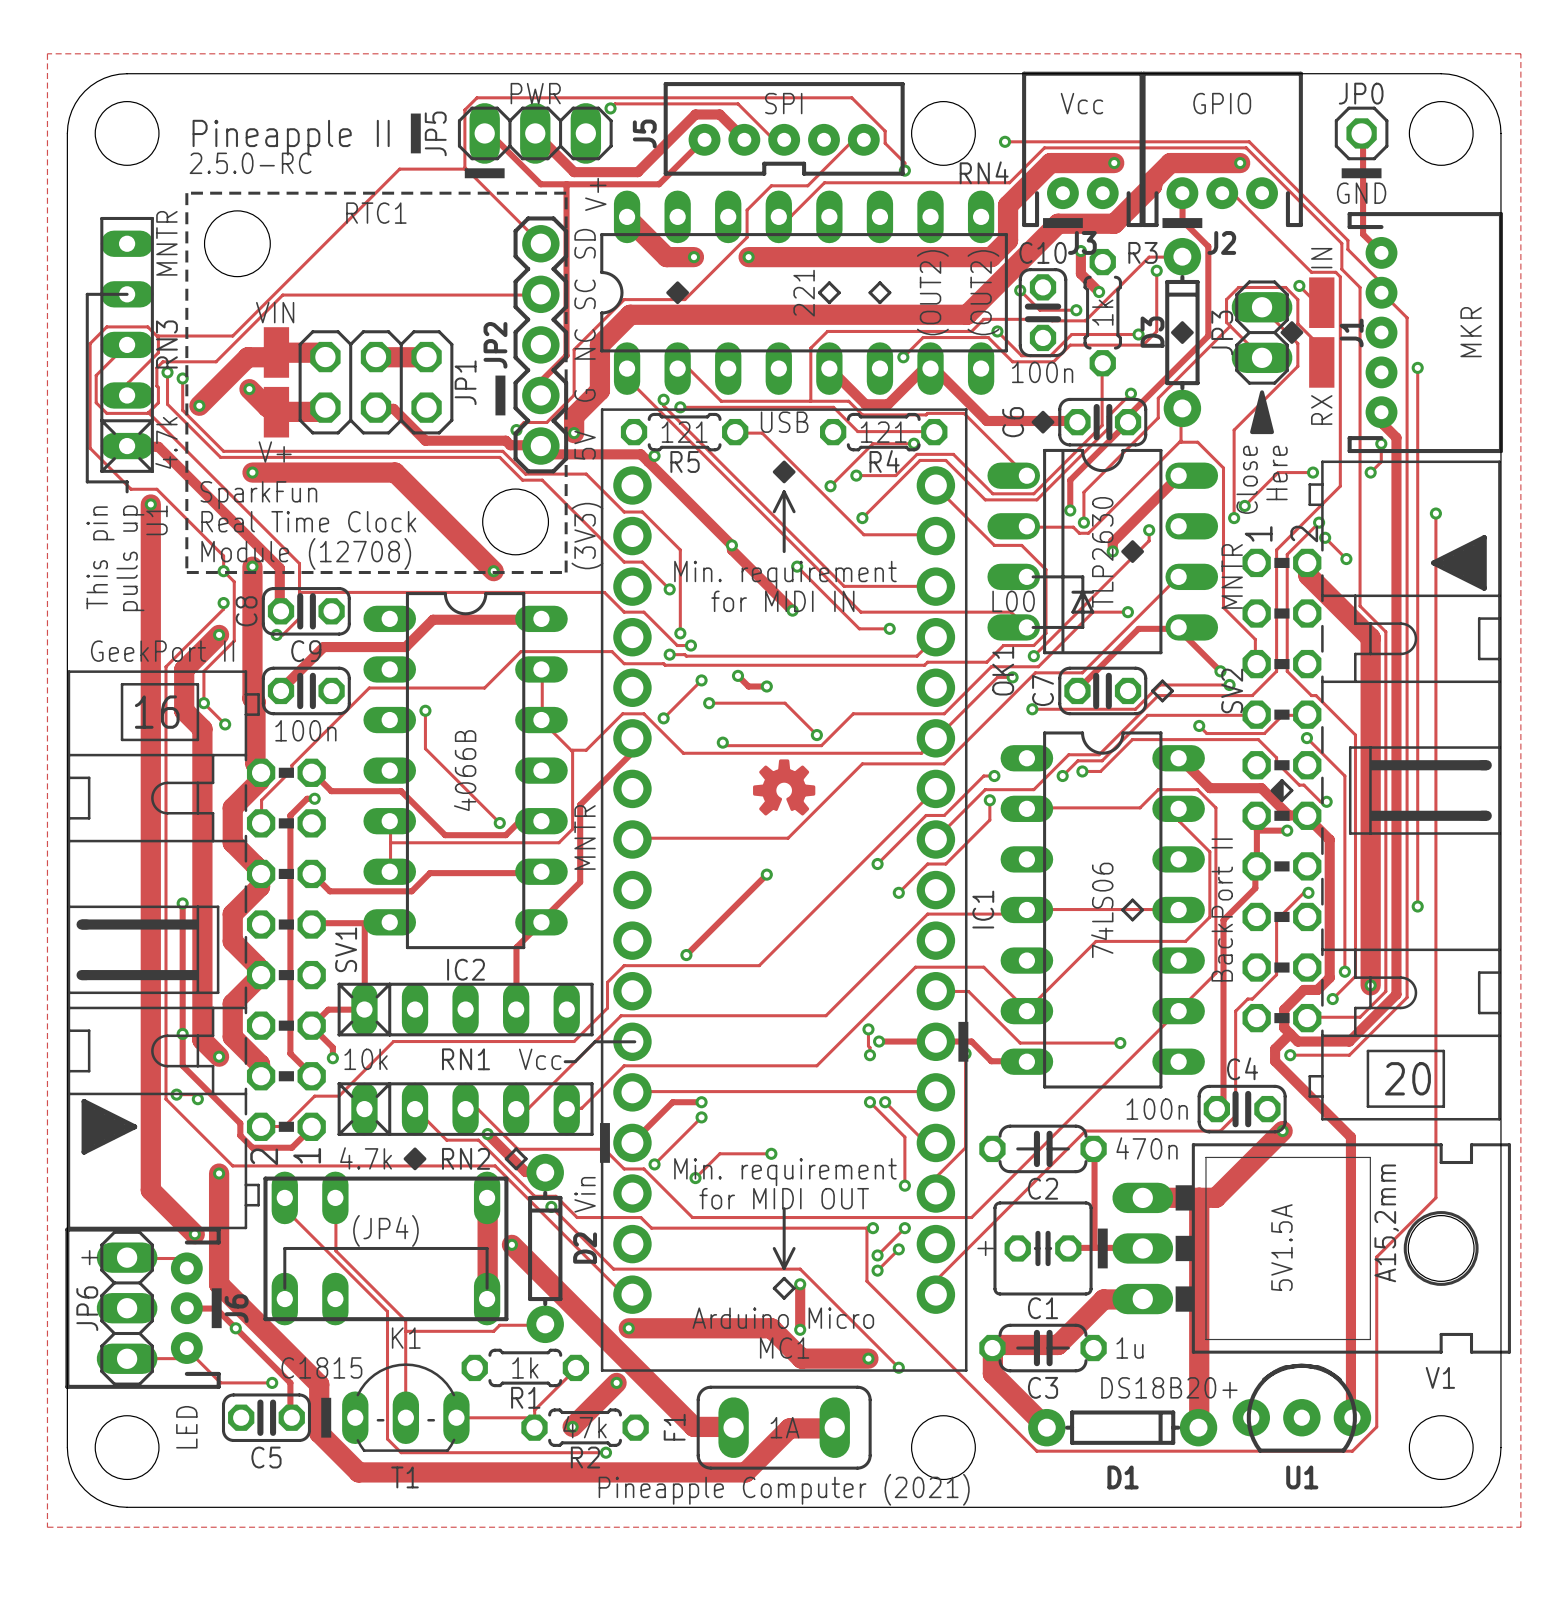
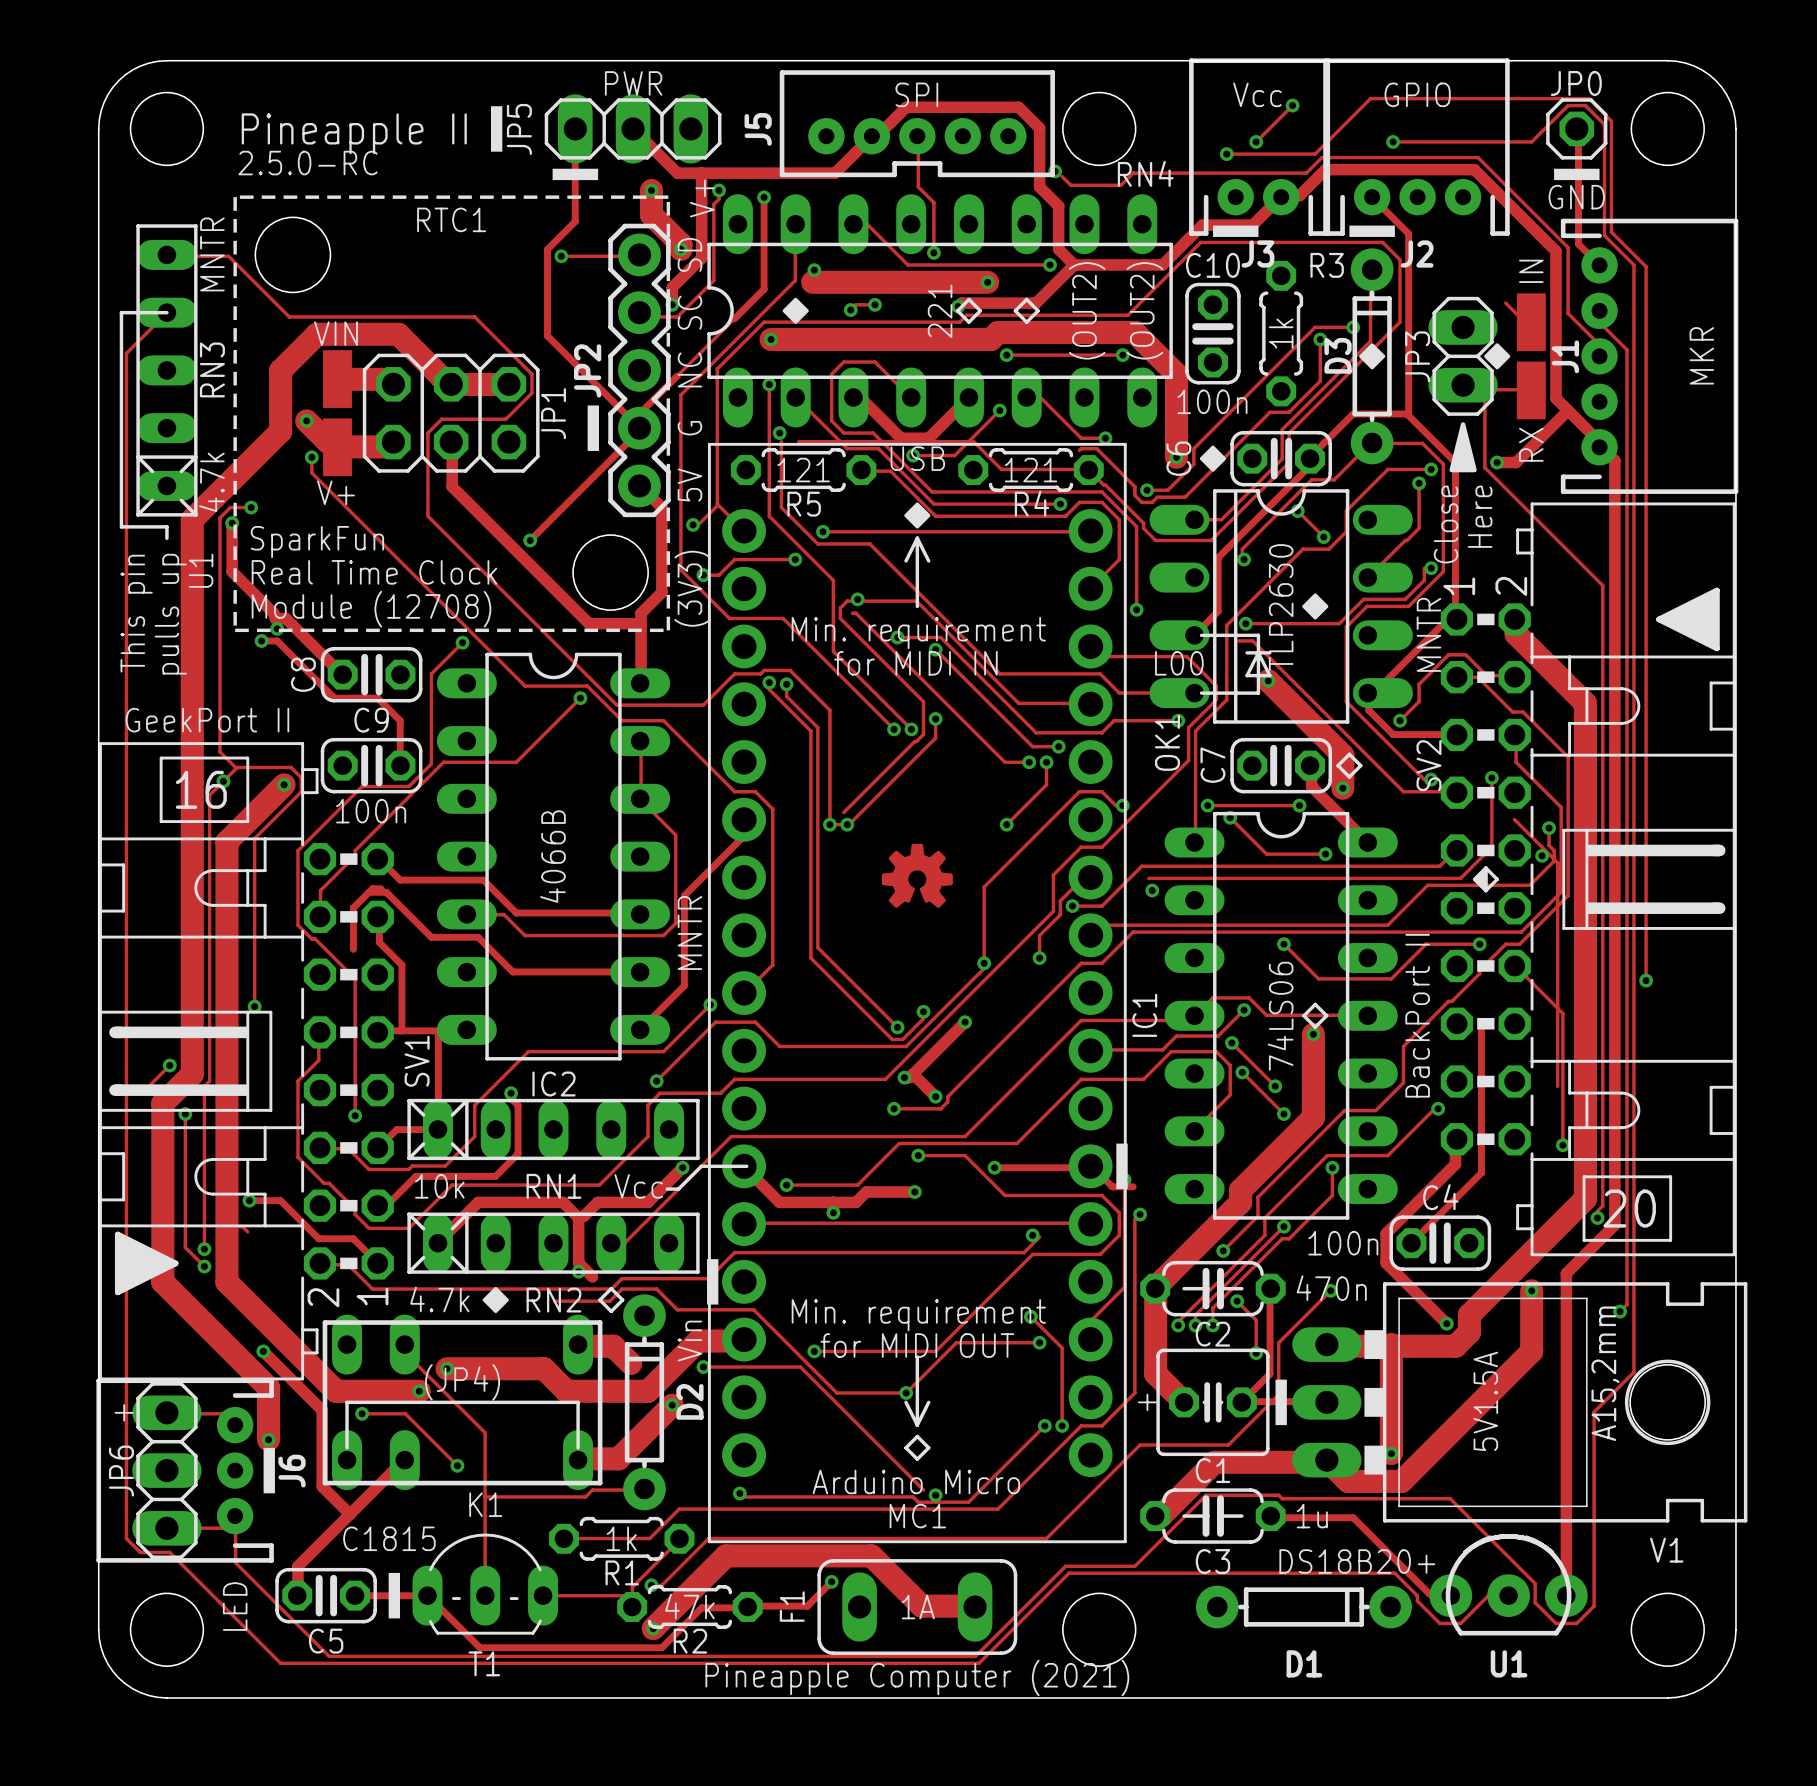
zone outline: (47, 53) (1520, 53) (1520, 1527) (47, 1527) (47, 53) -> none
track: (610, 108) (615, 103) (737, 103) (772, 138) (784, 139) -> (933, 252) (933, 202) (918, 187) (917, 136)
via: (610, 108) -> none
track: none -> (1292, 105) (1256, 141)
via: none -> (1292, 105)
track: (484, 133) (490, 134) (540, 184) (659, 184) (704, 139) -> none
track: (744, 139) (719, 114) (695, 114) (637, 172) -> (1074, 264) (1058, 249) (1058, 206) (1039, 187) (1039, 128) (1018, 107) (906, 107) (880, 133) (871, 136) (835, 173) (750, 173)
track: (863, 139) (853, 140) (807, 185) (771, 185) (747, 210) (747, 237) (684, 299) (624, 299) -> (764, 197) (764, 289) (734, 318)
track: (1005, 141) (1249, 141) (1347, 240) (1347, 249) (1381, 282) (1381, 292) -> none
via: (1005, 141) -> none
via: none -> (1256, 141)
track: none -> (1226, 154) (1315, 154) (1370, 98) (1588, 98) (1611, 121) (1611, 232) (1646, 266) (1646, 980)
via: none -> (1226, 154)
track: (1114, 163) (1050, 163) (1008, 205) (1008, 240) (991, 257) (748, 257) -> none
via: (1114, 163) -> none
track: (1240, 163) (1170, 163) (1152, 181) (1152, 185) (1114, 223) (1058, 223) (967, 314) (630, 314) (599, 345) (599, 390) (574, 416) (574, 433) -> none
via position: (1240, 163) -> (1393, 141)
track: (465, 168) (399, 169) (232, 336) (157, 336) -> none
track: (904, 170) (904, 163) (885, 143) (885, 131) (851, 97) (477, 97) (464, 109) (464, 167) (540, 243) -> (561, 256) (639, 254)
track: none -> (701, 173) (701, 258) (672, 287) (672, 304)
track: (918, 182) (824, 182) (791, 216) (778, 216) -> (1070, 185) (1062, 176)
track: (962, 182) (1009, 182) (1044, 147) (1246, 147) (1341, 243) (1341, 269) (1360, 287) (1360, 606) (1385, 631) (1385, 991) (1360, 1017) (1307, 1018) -> (1121, 185) (1133, 173) (1306, 173) (1322, 157) (1478, 157) (1568, 247) (1568, 313) (1599, 344) (1599, 356)
track: (566, 184) (566, 355) (542, 380) (540, 395) -> (575, 128) (575, 221) (547, 249) (547, 336) (639, 427)
track: none -> (651, 190) (651, 214) (680, 244) (680, 249)
via: none -> (651, 190)
via: none -> (719, 190)
via: none -> (764, 197)
track: (1182, 193) (1182, 220) (1208, 246) (1208, 336) (1129, 414) (1129, 419) -> (1372, 197) (1408, 233) (1408, 412) (1406, 413)
track: (1222, 193) (1232, 193) (1311, 272) (1335, 272) (1340, 276) (1340, 486) (1276, 549) (1276, 671) (1252, 695) (1158, 695) (1099, 754) (1068, 754) (1033, 789) -> none
track: (627, 216) (666, 257) (693, 257) -> none
track: none -> (853, 224) (868, 225) (907, 264) (1050, 264)
via: none -> (680, 249)
via: none -> (933, 252)
track: none -> (166, 254) (228, 256) (289, 316) (474, 316) (531, 374) (531, 393) (505, 419) (441, 419) (427, 433) (427, 516) (616, 705) (703, 705) (734, 673) (760, 673) (764, 670) (790, 670) (829, 710) (829, 824) (849, 824) (935, 738) (935, 718)
via: none -> (561, 256)
track: (1080, 251) (1080, 273) (1099, 292) -> none
via: (1080, 251) -> none
via: none -> (1050, 264)
track: none -> (1074, 264) (1162, 264) (1202, 225) (1252, 225) (1282, 195) (1299, 195) (1325, 169) (1474, 169) (1555, 251) (1555, 398) (1599, 441) (1599, 446)
track: none -> (1074, 264) (1036, 303) (961, 303) (958, 306)
via: (748, 257) -> none
track: (1181, 257) (1149, 257) (1085, 320) (983, 319) (971, 331) (964, 331) -> (1370, 270) (1370, 341) (1282, 429) (1282, 459) (1221, 519) (1194, 519)
track: none -> (812, 282) (987, 282)
via: none -> (987, 282)
track: (1156, 270) (1156, 331) (1143, 345) (1070, 345) (1053, 361) (1012, 361) (988, 337) (923, 337) (903, 357) -> none
via: (1156, 270) -> none
via: (1299, 285) -> none
via: none -> (672, 304)
track: none -> (874, 304) (855, 304) (850, 310)
via: none -> (874, 304)
via: none -> (958, 306)
track: (1020, 290) (1039, 310) (1076, 310) -> none
via: (1020, 290) -> none
via: none -> (850, 310)
via: (1099, 292) -> none
track: (1382, 293) (1407, 317) (1407, 997) (1349, 1055) (1290, 1055) -> (1601, 311) (1601, 323) (1627, 349) (1627, 1304) (1620, 1311)
track: none -> (166, 312) (126, 353) (126, 1538) (140, 1552) (169, 1552) (280, 1663) (978, 1663) (1069, 1573) (1394, 1573) (1417, 1595) (1417, 1600) (1439, 1623) (1460, 1623) (1488, 1595) (1508, 1595)
track: (540, 294) (282, 295) (216, 361) (162, 361) (156, 367) (158, 402) (147, 413) (106, 413) (96, 402) (96, 375) (127, 344) -> (639, 312) (644, 316) (677, 316) (713, 280) (713, 204) (719, 199) (719, 190)
track: none -> (1353, 327) (1315, 327) (1193, 448) (1193, 464) (1167, 490) (1147, 490)
via: none -> (1353, 327)
track: (1262, 307) (1297, 343) (1297, 366) (1234, 430) (1234, 518) -> none
via: (1076, 310) -> none
track: none -> (771, 339) (991, 339) (998, 332) (1134, 332) (1176, 374) (1176, 457)
via: none -> (771, 339)
track: (1230, 326) (1158, 398) (1158, 417) (1083, 492) (1083, 522) -> none
track: (862, 331) (827, 331) (810, 348) (810, 401) -> none
via: none -> (1006, 355)
via: none -> (1122, 355)
track: (997, 331) (1021, 355) (1050, 355) (1071, 334) (1138, 334) -> none
via: (997, 331) -> none
via position: (1138, 334) -> (1320, 339)
track: (574, 349) (574, 395) (546, 422) (524, 422) (516, 430) -> (677, 375) (634, 419) (639, 431) (530, 540)
track: (276, 352) (267, 357) (247, 357) (199, 405) -> none
track: none -> (451, 384) (441, 377) (398, 334) (317, 334) (280, 370) (280, 431) (192, 519) (192, 1074) (162, 1103) (162, 1282) (268, 1387) (268, 1439)
track: none -> (769, 384) (769, 516) (833, 580) (833, 651) (911, 729)
via: none -> (769, 384)
via: (903, 357) -> none
track: (1262, 357) (1226, 322) (1226, 299) (1238, 287) (1285, 287) (1297, 299) (1297, 323) (1320, 346) (1320, 361) -> (1597, 1218) (1597, 1211) (1602, 1205) (1602, 585) (1484, 467) (1484, 389) (1463, 385) (1467, 389) (1529, 389)
track: (1102, 363) (1102, 425) (1033, 493) -> (744, 530) (717, 504) (717, 368) (764, 322) (959, 322) (966, 315) (1127, 315) (1200, 242) (1382, 242) (1400, 259) (1400, 322) (1289, 433) (1289, 462) (1211, 540) (1202, 540)
track: (1417, 367) (1417, 906) -> none
via: (1417, 367) -> none
track: (627, 368) (627, 378) (860, 612) (1011, 612) (1026, 627) -> (781, 441) (781, 507) (817, 543) (869, 543) (999, 673) (1100, 673) (1119, 692) (1193, 692)
track: (829, 368) (865, 404) (888, 404) (923, 369) (930, 368) (935, 369) (986, 420) (1077, 422) -> (968, 397) (928, 438) (900, 438) (861, 398) (853, 397)
track: none -> (1026, 397) (1041, 398) (1081, 438) (1105, 438)
track: (678, 369) (689, 369) (709, 389) -> (911, 397) (874, 362) (843, 362) (831, 374) (831, 420)
track: none -> (797, 398) (847, 448) (878, 448) (933, 504) (1060, 504)
track: (167, 372) (167, 404) (220, 457) (499, 457) (522, 480) (542, 480) (624, 562) -> (795, 224) (795, 280) (680, 394) (680, 569) (729, 618) (734, 618)
via: (167, 372) -> none
track: (182, 378) (182, 410) (223, 451) (502, 451) (525, 474) (586, 474) (624, 512) (642, 512) (680, 549) (680, 633) -> none
via: (182, 378) -> none
track: none -> (999, 410) (954, 455) (913, 455)
via: none -> (999, 410)
track: none -> (1568, 410) (1516, 462) (1497, 462)
track: none -> (1406, 413) (1353, 413) (1311, 455)
track: (1130, 393) (1108, 416) (1108, 428) (1036, 499) (985, 499) (961, 475) -> (1090, 588) (1119, 559) (1119, 519)
via: (1130, 393) -> none
track: (127, 395) (128, 383) (158, 352) (158, 337) (147, 326) (106, 326) (90, 343) (90, 448) (131, 489) (156, 489) (223, 556) (223, 571) (234, 581) (234, 640) (203, 671) (203, 703) (225, 724) -> none
track: (663, 399) (663, 405) (844, 586) (935, 586) -> none
track: (719, 399) (848, 401) (862, 414) (926, 414) -> (843, 433) (873, 433) (932, 491) (1101, 491) (1136, 526) (1136, 609)
via: none -> (1105, 438)
via: (199, 405) -> none
via: (680, 407) -> none
track: (376, 408) (393, 408) (425, 440) (505, 440) (510, 445) (540, 446) -> (452, 443) (452, 486) (589, 623) (641, 623)
track: (1181, 408) (1181, 440) (1088, 533) (1079, 533) (1073, 527) (1026, 526) -> (1370, 443) (1334, 479) (1311, 479) (1242, 549) (1242, 554)
track: none -> (1372, 442) (1422, 443) (1443, 464) (1443, 571) (1408, 606) (1367, 606) (1346, 627) (1346, 701) (1424, 779) (1431, 779)
track: (148, 412) (299, 563) (299, 618) (282, 634) (276, 634) -> none
track: (1381, 412) (1382, 424) (1396, 437) (1396, 994) (1349, 1041) (1297, 1041) (1284, 1027) (1284, 1009) (1303, 989) (1317, 989) (1329, 977) (1329, 839) (1306, 815) (1288, 815) (1261, 788) (1209, 788) (1178, 758) -> (1310, 765) (1311, 765) (1311, 786) (1367, 842)
track: (941, 413) (964, 413) (1026, 475) -> (1096, 448) (1134, 486) (1134, 495) (1141, 502) (1152, 502) (1157, 497) (1185, 497) (1270, 412) (1289, 412) (1320, 381) (1320, 339)
via: none -> (913, 455)
track: none -> (311, 457) (311, 472) (524, 686) (587, 686) (622, 720)
via: none -> (311, 457)
via: none -> (1176, 457)
track: (1127, 422) (1070, 480) (1070, 510) -> (1309, 459) (1309, 465) (1218, 557) (1218, 611) (1194, 635)
via: none -> (1497, 462)
via: (516, 430) -> none
track: none -> (1431, 469) (1387, 469) (1346, 511) (1346, 531) (1328, 549) (1302, 549) (1226, 625) (1226, 699) (1195, 731) (1194, 842)
via: none -> (1431, 469)
via: (574, 433) -> none
track: (760, 433) (863, 534) (935, 536) -> (890, 471) (935, 516) (1065, 516) (1079, 502)
track: (1180, 441) (1197, 442) (1223, 468) -> (1419, 483) (1419, 511)
track: (913, 443) (873, 443) (830, 486) -> none
via position: (913, 443) -> (1060, 504)
via: none -> (1419, 483)
track: (1381, 443) (1381, 461) (1370, 472) -> none
via: (1381, 443) -> none
track: (127, 446) (158, 446) (279, 568) (279, 610) -> (232, 523) (232, 571) (273, 613) (275, 618) (285, 618) (341, 673)
via: none -> (1147, 490)
track: (549, 454) (640, 454) (731, 545) (731, 549) (792, 610) -> (649, 495) (661, 507) (661, 592) (641, 613) (640, 683)
via: (654, 455) -> none
track: (926, 460) (920, 460) (862, 518) -> none
track: none -> (718, 504) (698, 524) (693, 524)
track: none -> (251, 507) (230, 507) (220, 517) (220, 751) (236, 768)
via: none -> (251, 507)
track: none -> (1297, 511) (1323, 537)
via: none -> (1297, 511)
track: (252, 472) (395, 472) (493, 571) -> none
via: (252, 472) -> none
track: (1313, 472) (1278, 472) (1244, 505) -> none
via: (1313, 472) -> none
via: (1370, 472) -> none
track: (856, 475) (895, 475) (917, 454) (953, 454) (982, 483) -> (1088, 470) (1143, 523) (1143, 528)
via: (856, 475) -> none
track: (1178, 475) (1112, 542) (1112, 551) -> none
via: none -> (232, 523)
via: none -> (693, 524)
track: (1223, 483) (1223, 607) (1255, 639) (1255, 663) -> (1406, 413) (1455, 462) (1456, 619) (1446, 620) (1372, 694) (1367, 693) (1368, 710) (1393, 734) (1455, 734)
track: none -> (1419, 528) (1367, 577)
track: none -> (823, 531) (1089, 531)
via: none -> (823, 531)
via: (830, 486) -> none
track: (935, 486) (994, 545) (1021, 545) (1045, 569) (1045, 621) -> (1090, 646) (1100, 656) (1186, 656) (1216, 686)
via: none -> (1323, 537)
via: none -> (530, 540)
track: (150, 504) (150, 1190) (194, 1234) -> none
via: (150, 504) -> none
via: (1244, 505) -> none
track: none -> (795, 559) (734, 559) (719, 575) (703, 575)
via: none -> (795, 559)
track: (1435, 513) (1435, 1197) (1411, 1222) -> (1393, 141) (1531, 141) (1568, 105) (1585, 105) (1604, 124) (1604, 235) (1633, 264) (1633, 1372)
via: (1435, 513) -> none
via: (862, 518) -> none
track: none -> (1424, 568) (1424, 580) (1405, 599) (1363, 599) (1339, 623) (1245, 623)
via: (1083, 522) -> none
track: (1319, 522) (1287, 554) (1287, 671) (1311, 695) (1316, 695) -> (1514, 734) (1516, 762) (1524, 770)
via: (1319, 522) -> none
via: none -> (703, 575)
track: (1149, 530) (1149, 540) (1033, 656) -> none
via: (1149, 530) -> none
track: (1325, 537) (1346, 559) -> none
via: (1325, 537) -> none
via: (1112, 551) -> none
via: none -> (1136, 609)
track: none -> (852, 613) (855, 613) (1004, 762) (1029, 762)
via: (1346, 559) -> none
track: (642, 562) (669, 589) -> (755, 618) (783, 618) (894, 729)
track: (252, 566) (252, 698) (255, 701) (255, 763) (261, 772) (260, 780) (232, 807) (232, 842) (255, 865) (261, 873) (260, 886) (232, 914) (232, 941) (257, 965) (261, 975) (232, 1003) (232, 1036) (260, 1064) (261, 1076) -> none
via: (252, 566) -> none
track: (797, 566) (859, 628) (889, 628) -> none
via: (797, 566) -> none
via: none -> (1245, 623)
via: (493, 571) -> none
track: (1178, 576) (1082, 672) (1035, 672) (1021, 686) -> (1202, 713) (1188, 727) (1188, 760)
via: none -> (897, 637)
track: none -> (261, 640) (277, 640) (334, 698) (377, 698) (400, 720) (400, 765)
via: none -> (261, 640)
track: none -> (462, 642) (431, 673) (431, 764) (408, 786) (362, 786) (297, 850) (297, 925) (311, 939) (315, 939) (355, 978) (355, 1115)
via: none -> (462, 642)
via: (669, 589) -> none
track: none -> (935, 649) (1032, 746) (1058, 746)
via: none -> (935, 649)
track: (299, 592) (604, 592) (624, 612) (643, 612) (677, 645) (690, 645) -> none
track: (223, 603) (223, 609) (165, 666) (165, 1099) (232, 1165) (495, 1165) (622, 1293) (632, 1294) -> none
via: (223, 603) -> none
via: (792, 610) -> none
track: (1127, 612) (1093, 612) (1038, 666) (991, 666) (944, 713) -> (1122, 805) (1115, 805) (1100, 791)
via: (1127, 612) -> none
track: none -> (1457, 677) (1478, 677) (1512, 712) (1523, 712) (1568, 757) (1568, 895) (1519, 944) (1505, 944) (1452, 1001) (1448, 1001) (1403, 1046) (1403, 1082) (1375, 1110) (1344, 1110) (1257, 1197) (1257, 1216) (1223, 1250)
track: none -> (1514, 677) (1514, 675) (1486, 675) (1465, 654) (1448, 654) (1419, 684) (1419, 701) (1400, 720)
track: none -> (1268, 680) (1342, 755) (1342, 788)
via: none -> (1268, 680)
track: (541, 618) (433, 619) (405, 647) (323, 647) (281, 690) -> none
via: none -> (769, 682)
track: none -> (786, 684) (786, 696) (817, 727) (817, 947) (897, 1027)
via: none -> (786, 684)
via: (889, 628) -> none
via: none -> (580, 698)
via: (680, 633) -> none
track: (219, 634) (184, 669) (184, 710) (202, 728) (202, 1040) (219, 1056) -> none
via: (219, 634) -> none
via: (276, 634) -> none
track: (1369, 636) (1370, 637) (1370, 985) -> (1585, 703) (1585, 1198) (1469, 1315) (1469, 1332) (1455, 1346) (1327, 1346) (1326, 1344)
track: (935, 637) (917, 656) (686, 656) -> (1090, 704) (1018, 703) (916, 601) (847, 601) (840, 608) (840, 618) (923, 701) (923, 734) (843, 812)
via: (690, 645) -> none
track: (1033, 645) (1003, 645) (986, 662) (945, 662) -> (1178, 720) (1114, 720) (1101, 732)
via: none -> (935, 718)
track: (525, 651) (521, 651) (484, 688) (433, 688) -> (580, 698) (516, 762)
track: (561, 651) (612, 651) (624, 663) (665, 665) (924, 665) (927, 662) -> (897, 637) (940, 637) (1036, 732) (1081, 732)
via: none -> (1178, 720)
via: none -> (1400, 720)
track: (669, 654) (684, 654) -> (769, 682) (769, 689) (803, 724)
via: (669, 654) -> none
track: none -> (805, 725) (810, 731) (810, 958) (892, 1039) (902, 1039) (923, 1018) (923, 1011)
via: (1033, 656) -> none
via: none -> (894, 729)
via: none -> (911, 729)
track: (1220, 671) (1178, 627) (1138, 628) (1077, 690) -> none
via: (1220, 671) -> none
via: none -> (1058, 746)
track: (737, 675) (748, 686) (766, 686) -> none
via: (737, 675) -> none
track: (1012, 677) (997, 677) (921, 753) (683, 753) (642, 713) -> (744, 993) (772, 965) (772, 809) (755, 791)
via: (1012, 677) -> none
track: (701, 680) (663, 718) -> none
via: (701, 680) -> none
track: (1229, 684) (1159, 684) (1135, 709) (1032, 709) -> none
via: (1229, 684) -> none
via: (766, 686) -> none
via: none -> (1029, 762)
track: none -> (1046, 762) (1046, 784) (1006, 824)
via: none -> (1046, 762)
track: none -> (1491, 777) (1491, 847) (1460, 878) (1389, 878)
via: none -> (1491, 777)
via: (203, 703) -> none
track: (709, 703) (785, 703) (816, 735) -> none
via: (709, 703) -> none
via: none -> (1431, 779)
via: none -> (223, 781)
track: none -> (284, 784) (226, 841) (226, 1282) (336, 1391) (419, 1391)
via: none -> (284, 784)
via position: (1032, 709) -> (1207, 805)
track: (425, 710) (425, 748) (499, 823) -> none
via: (425, 710) -> none
via: none -> (1342, 788)
track: (624, 713) (586, 750) (571, 750) -> (734, 791) (663, 720)
track: (926, 713) (853, 713) (821, 745) (725, 745) (722, 742) -> (1079, 791) (984, 887) (984, 968) (906, 1046) (779, 1046) (755, 1022) (715, 1022) (656, 1081)
track: (1256, 714) (1147, 715) (1102, 760) (1077, 760) (1062, 776) -> (1456, 792) (1403, 791) (1252, 640) (1238, 640)
track: (1307, 714) (1282, 715) (1264, 733) (1206, 733) (1199, 725) -> none
via: (663, 718) -> none
via: (225, 724) -> none
via: none -> (1122, 805)
track: none -> (1207, 805) (1299, 805)
via: none -> (1299, 805)
via: (1199, 725) -> none
track: (1347, 727) (1355, 735) (1355, 976) (1332, 999) -> none
via: (816, 735) -> none
track: none -> (1230, 817) (1266, 854) (1325, 854)
via: none -> (1230, 817)
via: (1306, 738) -> none
via: none -> (829, 824)
via: none -> (1006, 824)
via: none -> (1549, 828)
track: (945, 762) (862, 763) (788, 838) (632, 839) -> none
via: none -> (1325, 854)
via: none -> (1542, 855)
track: (1082, 771) (1100, 771) (1132, 739) (1258, 739) (1276, 757) (1276, 762) (1299, 785) (1303, 785) (1320, 801) (1326, 801) -> none
via: (1082, 771) -> none
track: (994, 776) (983, 776) (980, 779) -> (1456, 850) (1439, 866) (1141, 866)
via: (994, 776) -> none
via: (1062, 776) -> none
track: (935, 789) (759, 965) (756, 965) -> (1101, 847) (1081, 847) (1053, 874) (1053, 911) (885, 1079)
track: none -> (1089, 878) (1082, 878) (1060, 900) (1060, 914) (1039, 935) (1039, 958)
track: (986, 789) (944, 830) -> (1549, 828) (1549, 845) (1554, 850) (1554, 861) (1529, 885) (1427, 885) (1387, 925) (1100, 925)
track: (1158, 789) (1140, 807) (1026, 808) -> (1344, 878) (1202, 878)
track: (1197, 789) (1215, 807) (1215, 973) (971, 1217) (692, 1217) (643, 1168) (624, 1168) (604, 1149) (555, 1149) -> (1039, 1342) (956, 1342) (906, 1393) (836, 1393) (753, 1309) (677, 1309) (656, 1289)
track: (401, 791) (445, 835) (505, 835) (519, 821) (541, 821) -> (479, 880) (483, 880) (516, 913) (640, 914)
via: (314, 798) -> none
track: (989, 800) (989, 820) (973, 836) -> (1561, 807) (1561, 892) (1521, 932) (1133, 932)
via: (1326, 801) -> none
track: (1178, 808) (1179, 821) (1209, 851) (1209, 917) (1185, 941) (1096, 941) (1058, 979) -> (786, 1185) (857, 1185) (899, 1143) (1017, 1143) (1081, 1079) (1143, 1079) (1171, 1051) (1216, 1051) (1230, 1065) (1230, 1094)
via: none -> (1072, 906)
track: (945, 813) (926, 815) (877, 864) -> (1101, 906) (1072, 906)
track: (1256, 815) (1255, 888) (1223, 920) (1223, 1102) -> (1481, 1023) (1481, 1172) (1419, 1235)
track: (390, 821) (389, 871) -> none
track: none -> (377, 916) (379, 918) (379, 942) (401, 965) (401, 1030)
via: (499, 823) -> none
track: (1256, 830) (1287, 830) -> none
via position: (1287, 830) -> (1479, 944)
track: (561, 839) (558, 842) (390, 842) -> (663, 935) (524, 935) (504, 914) (467, 914)
track: none -> (1283, 944) (1318, 978) (1391, 978) (1426, 944) (1479, 944)
via: none -> (1283, 944)
track: (290, 851) (290, 1053) (311, 1076) -> (511, 1093) (511, 1098) (518, 1105) (518, 1153) (495, 1176) (415, 1176) (388, 1204) (377, 1205)
via: none -> (984, 963)
via position: (877, 864) -> (1039, 958)
track: none -> (1514, 965) (1562, 1013) (1562, 1145)
track: (541, 871) (429, 873) (411, 891) (329, 891) (311, 873) -> (640, 972) (512, 971) (478, 937) (431, 937) (386, 892) (369, 892)
track: (766, 874) (686, 955) -> none
via: (766, 874) -> none
track: (580, 882) (516, 947) (516, 1009) -> (684, 984) (640, 1029)
track: none -> (1048, 996) (947, 1096) (947, 1101) (940, 1108) (894, 1108)
via: (898, 892) -> none
track: (1308, 892) (1303, 892) (1276, 920) (1276, 974) (1252, 999) (1247, 999) (1235, 1011) (1235, 1115) (1220, 1131) (1085, 1131) (936, 1279) (935, 1294) -> none
via: (1308, 892) -> none
track: none -> (710, 1004) (663, 1051) (528, 1051) (474, 1105) (474, 1136) (445, 1166) (412, 1166) (408, 1169) (369, 1169) (348, 1148) (319, 1147)
via: none -> (710, 1004)
track: none -> (254, 1006) (254, 838) (301, 791) (301, 777) (291, 767) (237, 767) (209, 795) (209, 1081) (204, 1086) (204, 1249)
track: (182, 903) (182, 1065) (240, 1123) (240, 1135) (252, 1147) (291, 1147) (311, 1126) -> (249, 1200) (280, 1200) (318, 1238) (353, 1238) (377, 1263)
via position: (182, 903) -> (254, 1006)
track: none -> (1244, 1010) (1218, 1036) (1176, 1036) (1162, 1049) (1090, 1050)
via: none -> (1244, 1010)
via: none -> (923, 1011)
via position: (1417, 906) -> (1646, 980)
track: (1027, 909) (1089, 909) -> (1195, 1015) (1212, 997) (1249, 997) (1266, 1015)
track: none -> (965, 1022) (909, 1077) (904, 1077)
via: none -> (965, 1022)
via: none -> (897, 1027)
track: none -> (1313, 1034) (1313, 1117) (1240, 1190) (1240, 1202) (1155, 1288) (1155, 1373) (1184, 1402)
via: none -> (1313, 1034)
track: none -> (1231, 1042) (1275, 1086)
via: none -> (1231, 1042)
track: none -> (169, 1065) (148, 1086)
via: none -> (169, 1065)
via: (686, 955) -> none
track: none -> (1242, 1072) (1283, 1114)
via: none -> (1242, 1072)
track: none -> (913, 1074) (935, 1096)
via: none -> (904, 1077)
via: none -> (656, 1081)
via: none -> (1275, 1086)
via: (1344, 971) -> none
via: none -> (511, 1093)
track: (612, 977) (607, 982) (607, 1008) (574, 1041) (393, 1041) (376, 1058) -> (720, 1093) (660, 1093) (648, 1105) (648, 1136) (599, 1185) (452, 1185)
via: none -> (935, 1096)
via: (1370, 985) -> none
via: none -> (894, 1108)
track: (935, 991) (968, 991) (1020, 1043) (1120, 1043) -> none
track: none -> (1438, 1108) (1434, 1108) (1387, 1155) (1327, 1155) (1264, 1218) (1264, 1235) (1178, 1321) (1178, 1325)
via: none -> (1438, 1108)
track: none -> (185, 1114) (185, 1247) (204, 1266)
via: none -> (185, 1114)
via: none -> (1283, 1114)
via: none -> (355, 1115)
via: (1332, 999) -> none
track: (1026, 1011) (983, 967) (915, 967) (816, 1065) (624, 1065) (581, 1108) (566, 1109) -> none
track: none -> (1456, 1139) (1455, 1164) (1386, 1233) (1386, 1263) (1446, 1323)
via: none -> (1562, 1145)
track: (311, 1025) (332, 1047) (332, 1058) -> none
track: (868, 1029) (869, 1055) -> none
via: (868, 1029) -> none
track: none -> (918, 1155) (965, 1155) (1004, 1195) (1101, 1195) (1119, 1212) (1119, 1235) (1100, 1254) (1032, 1254) (935, 1351) (814, 1351)
via: none -> (918, 1155)
via: (182, 1033) -> none
track: (1290, 1033) (1275, 1049) (1275, 1061) (1350, 1137) (1352, 1417) -> (1599, 447) (1614, 460) (1614, 1224) (1566, 1273) (1566, 1595)
track: none -> (744, 1166) (779, 1202) (855, 1202) (866, 1192) (914, 1192)
track: (879, 1041) (971, 1041) (991, 1061) (1026, 1061) -> none
via: (879, 1041) -> none
track: none -> (682, 1167) (648, 1202) (597, 1202) (583, 1216) (578, 1218)
via: none -> (682, 1167)
track: none -> (994, 1167) (1090, 1166) (1112, 1186) (1133, 1186)
via: none -> (994, 1167)
via: (1120, 1043) -> none
track: none -> (1332, 1167) (1332, 1195) (1289, 1238) (1282, 1238) (1212, 1308) (1212, 1325)
via: none -> (1332, 1167)
via: (869, 1055) -> none
via: (1290, 1055) -> none
via: (219, 1056) -> none
via: (332, 1058) -> none
via: none -> (786, 1185)
via: none -> (914, 1192)
via: none -> (249, 1200)
via: none -> (833, 1212)
track: none -> (1140, 1214) (1134, 1219) (1134, 1393) (1101, 1425) (1081, 1425) (998, 1509) (679, 1509) (649, 1538) (563, 1538)
via: none -> (1140, 1214)
track: none -> (578, 1218) (578, 1263) (592, 1276)
track: none -> (578, 1218) (563, 1202) (478, 1202) (437, 1243)
via: none -> (1597, 1218)
via: (176, 1094) -> none
track: none -> (1283, 1226) (1195, 1315) (1195, 1325)
via: none -> (1283, 1226)
track: (314, 1096) (284, 1126) (261, 1126) -> (381, 1228) (369, 1228) (355, 1214) (355, 1209) (329, 1183) (323, 1183) (297, 1157) (297, 1081) (318, 1060) (319, 1032)
via: (197, 1099) -> none
track: (701, 1102) (672, 1102) (632, 1142) -> none
via: (701, 1102) -> none
track: (869, 1102) (904, 1137) (904, 1185) -> none
via: (869, 1102) -> none
track: (885, 1102) (924, 1141) (935, 1142) -> none
track: none -> (1039, 1237) (1024, 1252) (734, 1252) (708, 1278) (622, 1278) (611, 1289) (372, 1289) (348, 1264) (319, 1263)
track: (415, 1109) (446, 1140) (478, 1140) (534, 1196) (555, 1196) (577, 1217) (596, 1217) -> none
track: (465, 1109) (478, 1109) (517, 1149) (525, 1149) -> (554, 1301) (609, 1301) (622, 1289)
via: none -> (204, 1249)
via: none -> (1223, 1250)
track: (701, 1117) (654, 1164) -> none
via: (701, 1117) -> none
via: none -> (204, 1266)
track: (1282, 1131) (1215, 1197) (1143, 1197) -> none
via: (1282, 1131) -> none
track: (487, 1134) (525, 1172) (545, 1172) -> none
track: (1093, 1148) (1094, 1247) -> (1270, 1288) (1270, 1373) (1242, 1401)
track: none -> (1330, 1290) (1278, 1342) (1278, 1394) (1228, 1444) (1140, 1444) (1046, 1538) (708, 1538) (661, 1585) (651, 1585)
via: none -> (1330, 1290)
track: none -> (1531, 1290) (1531, 1351) (1401, 1481) (1348, 1481) (1326, 1460) (1315, 1462) (1214, 1462) (1160, 1516) (1155, 1516)
via: none -> (1531, 1290)
track: (771, 1153) (719, 1153) (695, 1178) -> none
via: (771, 1153) -> none
track: none -> (1237, 1301) (1256, 1320) (1256, 1353)
via: none -> (1237, 1301)
via: (654, 1164) -> none
via: none -> (1620, 1311)
track: (219, 1173) (219, 1284) (319, 1384) (319, 1432) (358, 1472) (745, 1472) (789, 1428) (834, 1427) -> (725, 1555) (871, 1555) (921, 1606) (975, 1607)
via: (219, 1173) -> none
track: none -> (1030, 1316) (1062, 1347) (1062, 1425)
via: none -> (1030, 1316)
via position: (695, 1178) -> (814, 1351)
via: none -> (1446, 1323)
via: none -> (1178, 1325)
via: none -> (1195, 1325)
via: none -> (1212, 1325)
via: (904, 1185) -> none
track: none -> (744, 1339) (698, 1341) (648, 1391) (566, 1391) (544, 1368) (447, 1368)
via: none -> (1039, 1342)
track: (284, 1197) (285, 1209) (387, 1311) (387, 1439) (401, 1452) (605, 1452) -> none
track: (487, 1199) (487, 1297) -> (578, 1346) (613, 1346) (630, 1363)
track: none -> (263, 1351) (322, 1410) (322, 1486) (349, 1514)
via: none -> (263, 1351)
track: (335, 1205) (335, 1250) (405, 1320) -> (405, 1353) (485, 1432) (485, 1484)
via: none -> (1256, 1353)
track: (551, 1206) (613, 1269) (800, 1269) (898, 1367) -> none
via: (551, 1206) -> none
via: none -> (703, 1367)
track: (640, 1217) (651, 1228) (873, 1228) -> (753, 1367) (800, 1367) (923, 1490)
via: none -> (447, 1368)
track: (866, 1228) (866, 1281) (1036, 1451) (1352, 1451) (1361, 1442) -> (235, 1517) (235, 1562) (329, 1656) (975, 1656) (1065, 1566) (1134, 1566) (1205, 1495) (1278, 1495) (1282, 1498) (1450, 1498) (1535, 1583) (1535, 1602) (1555, 1623) (1576, 1623)
via: (873, 1228) -> none
track: (904, 1228) (877, 1255) -> none
via: (904, 1228) -> none
via: (194, 1234) -> none
via: none -> (419, 1391)
via: none -> (906, 1393)
track: (511, 1244) (693, 1426) (733, 1427) -> none
via: (511, 1244) -> none
track: (898, 1249) (877, 1270) -> none
via: (898, 1249) -> none
track: none -> (672, 1405) (618, 1458) (578, 1458)
via: none -> (672, 1405)
via: (877, 1255) -> none
track: none -> (362, 1413) (405, 1413) (457, 1465)
via: none -> (362, 1413)
track: none -> (1044, 1425) (968, 1502) (918, 1502) (913, 1496) (739, 1496)
via: none -> (1044, 1425)
via: none -> (1062, 1425)
via: (877, 1270) -> none
via: none -> (268, 1439)
track: (800, 1284) (800, 1329) -> none
via: (800, 1284) -> none
track: (1199, 1293) (1198, 1427) -> none
via: none -> (1391, 1453)
track: none -> (404, 1460) (297, 1566) (297, 1595)
track: (1142, 1299) (1103, 1299) (1058, 1344) (1001, 1344) (992, 1348) (992, 1373) (1046, 1427) -> none
via: none -> (457, 1465)
track: (186, 1308) (216, 1308) (290, 1382) (291, 1417) -> (831, 1581) (807, 1606) (701, 1607) (661, 1647) (479, 1647) (427, 1595) (355, 1595)
via: (235, 1328) -> none
track: (628, 1328) (771, 1328) (801, 1358) (868, 1358) -> none
track: none -> (1270, 1516) (1271, 1517) (1353, 1517) (1429, 1594) (1450, 1594) (1450, 1595)
track: (187, 1349) (220, 1382) (272, 1382) -> none
via: (868, 1358) -> none
via: (898, 1367) -> none
via: (272, 1382) -> none
via: (616, 1382) -> none
via: none -> (831, 1581)
via: none -> (651, 1585)
track: none -> (675, 1606) (653, 1628)
via: (572, 1426) -> none
via: none -> (653, 1628)
via: (605, 1452) -> none

